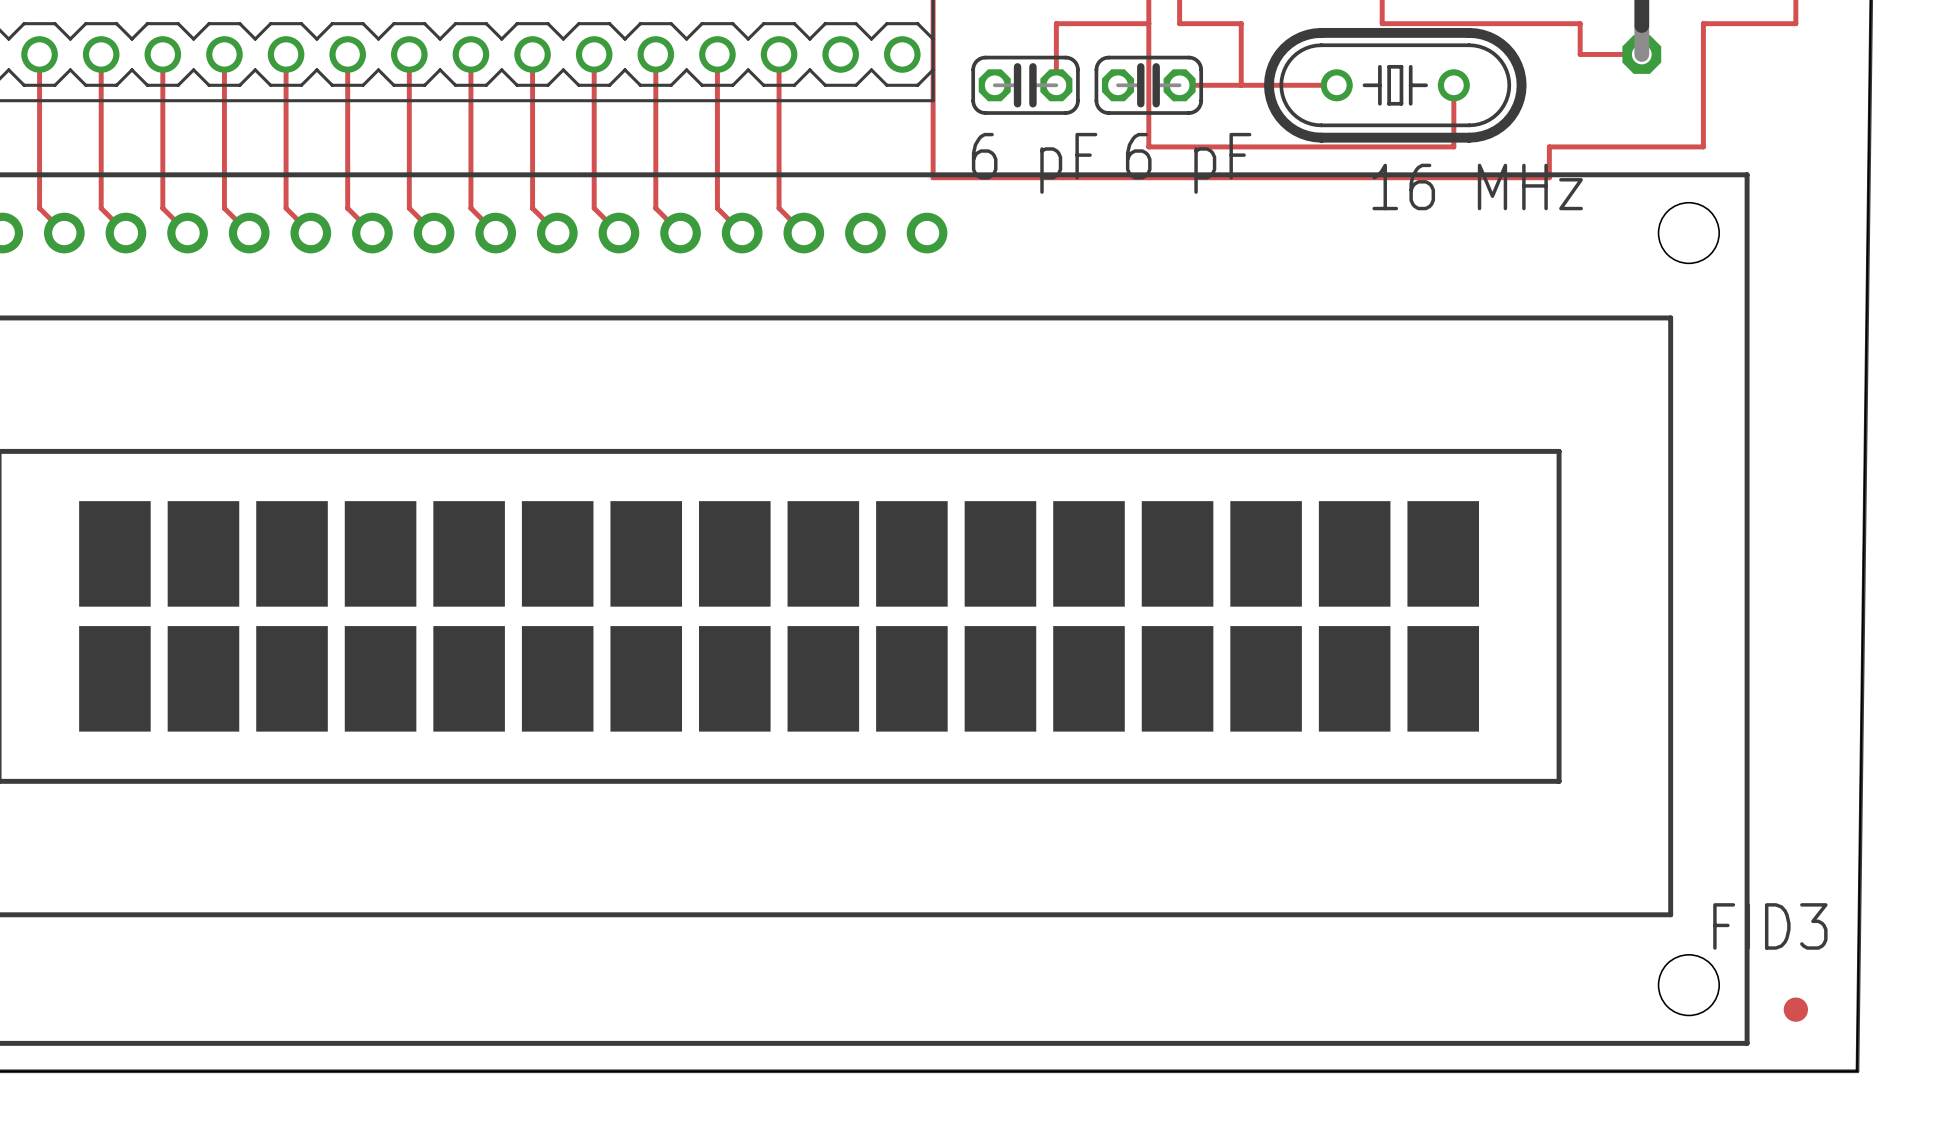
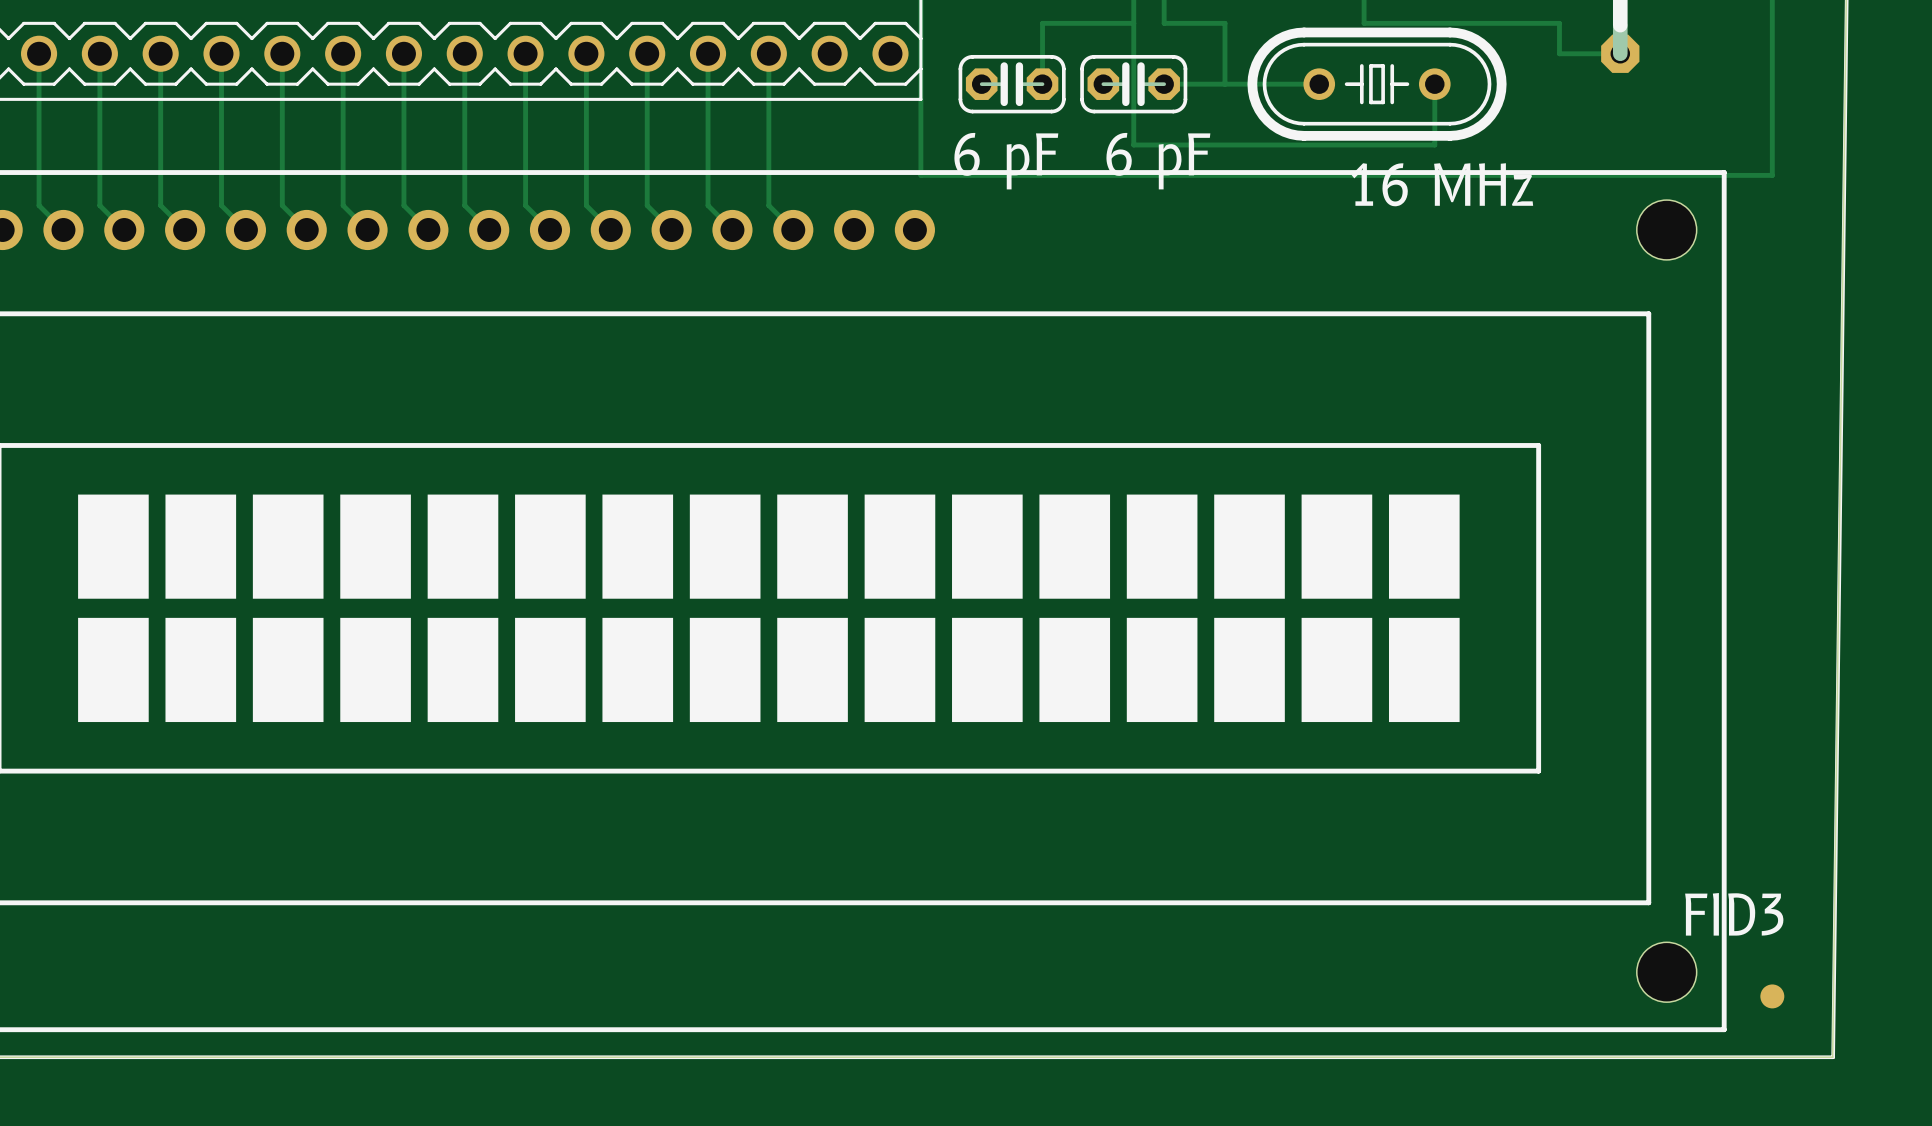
track: (1795, 23) (1703, 23) (1703, 146) (1549, 146) (1549, 177) -> (1772, 23) (1772, 175) (1529, 175)

